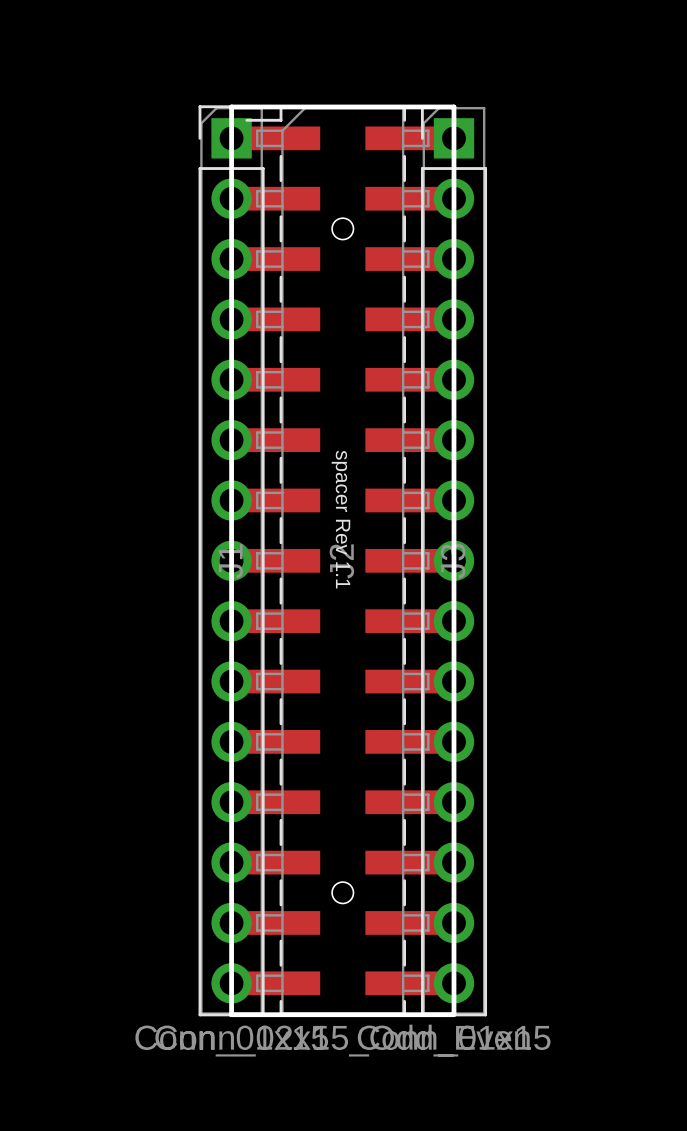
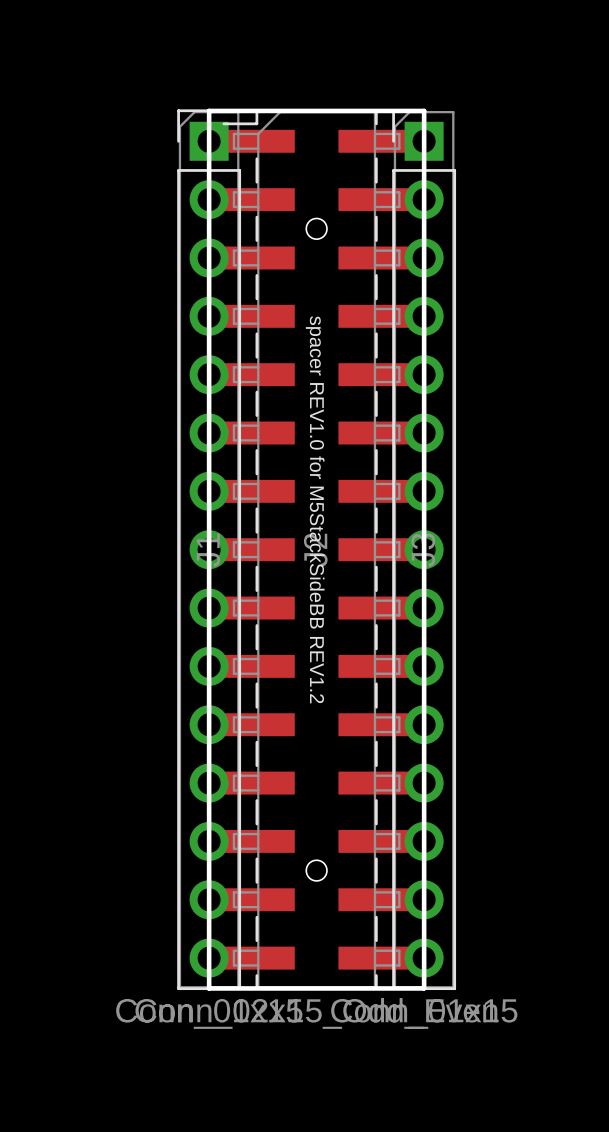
text: spacer Rev 1.1 (340, 519) -> spacer REV1.0 for M5StackSideBB REV1.2 (315, 509)

